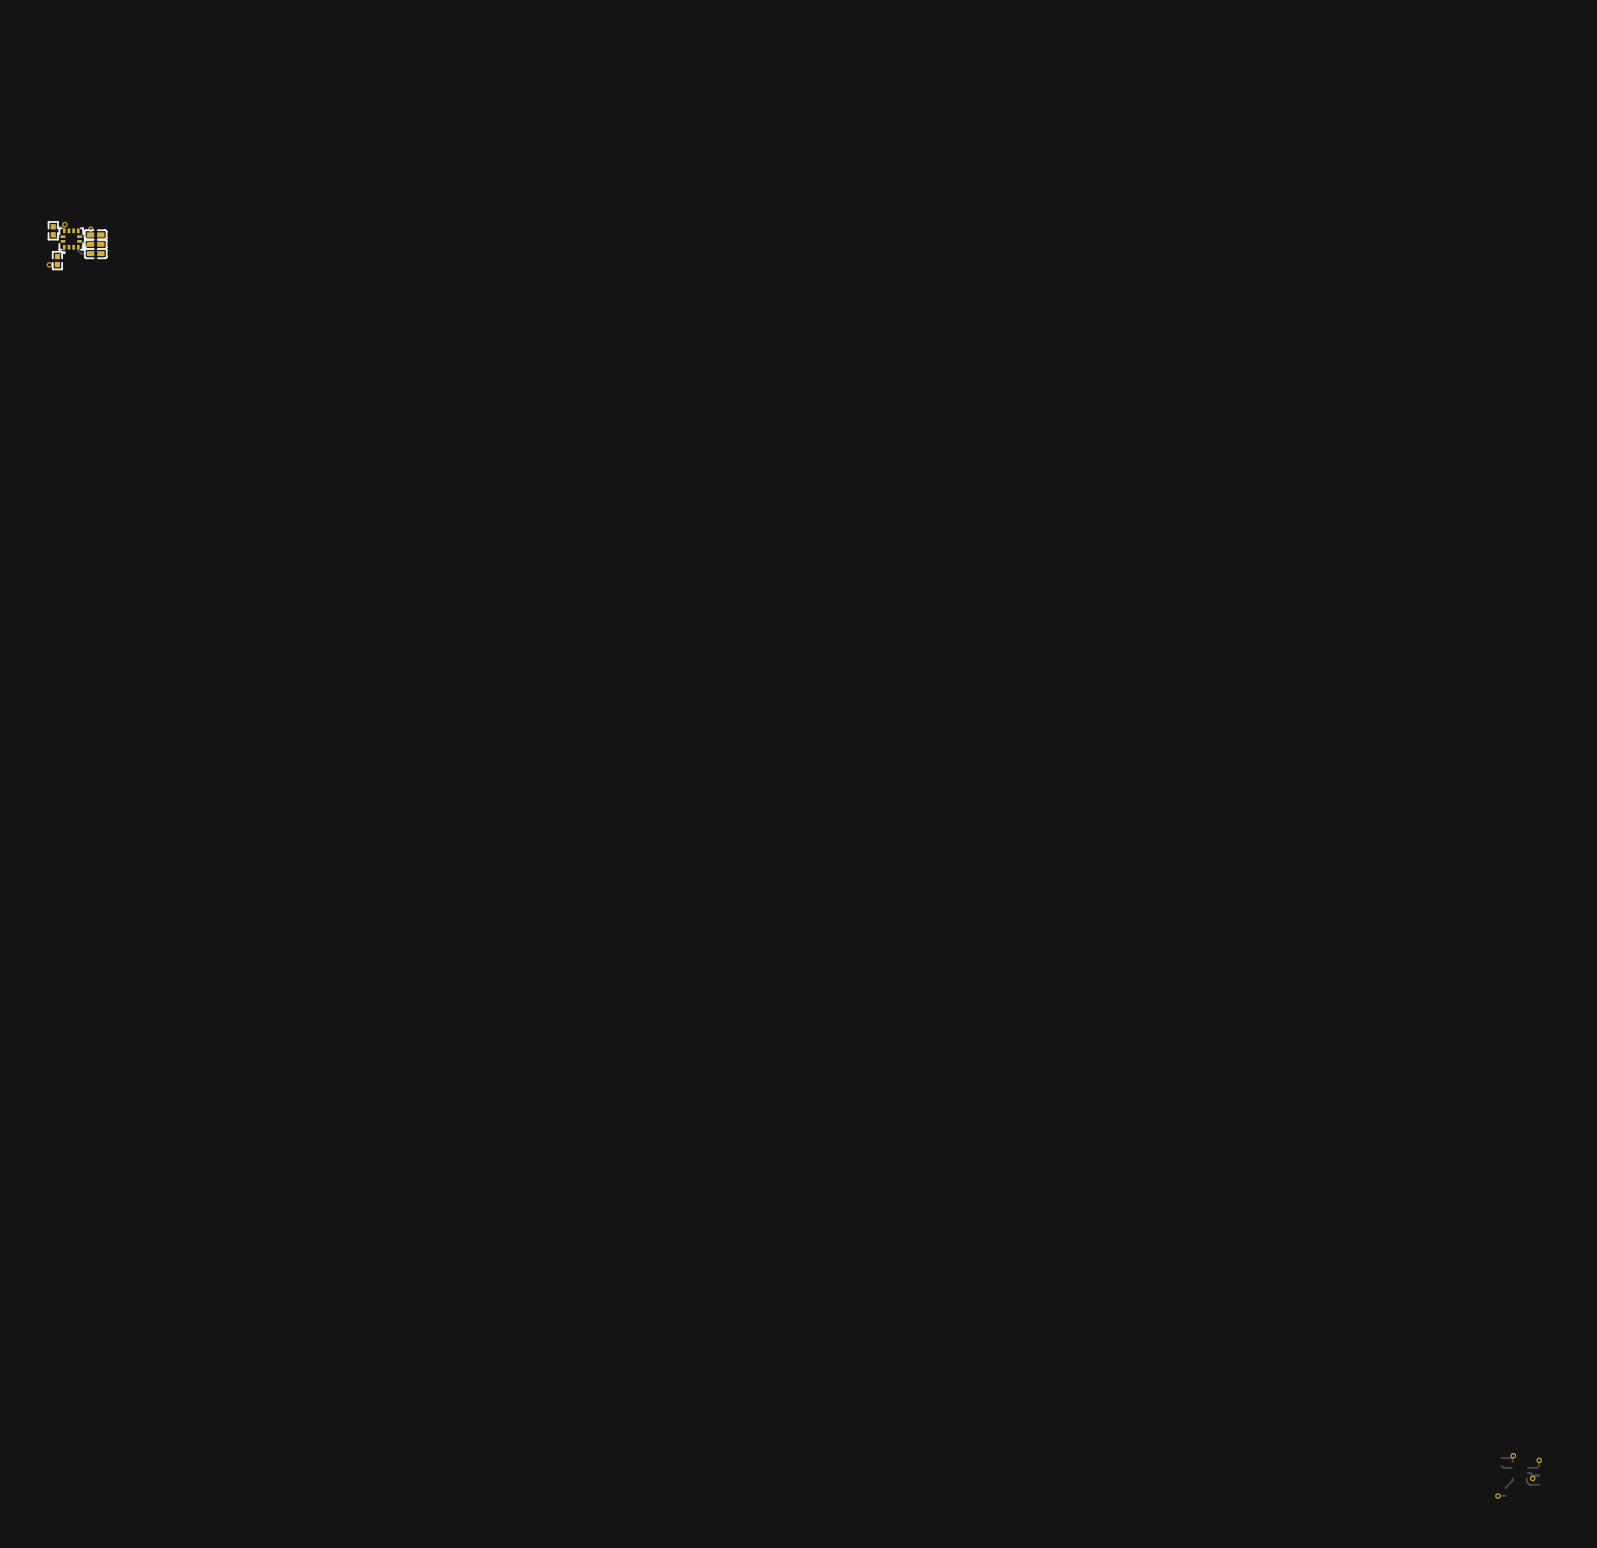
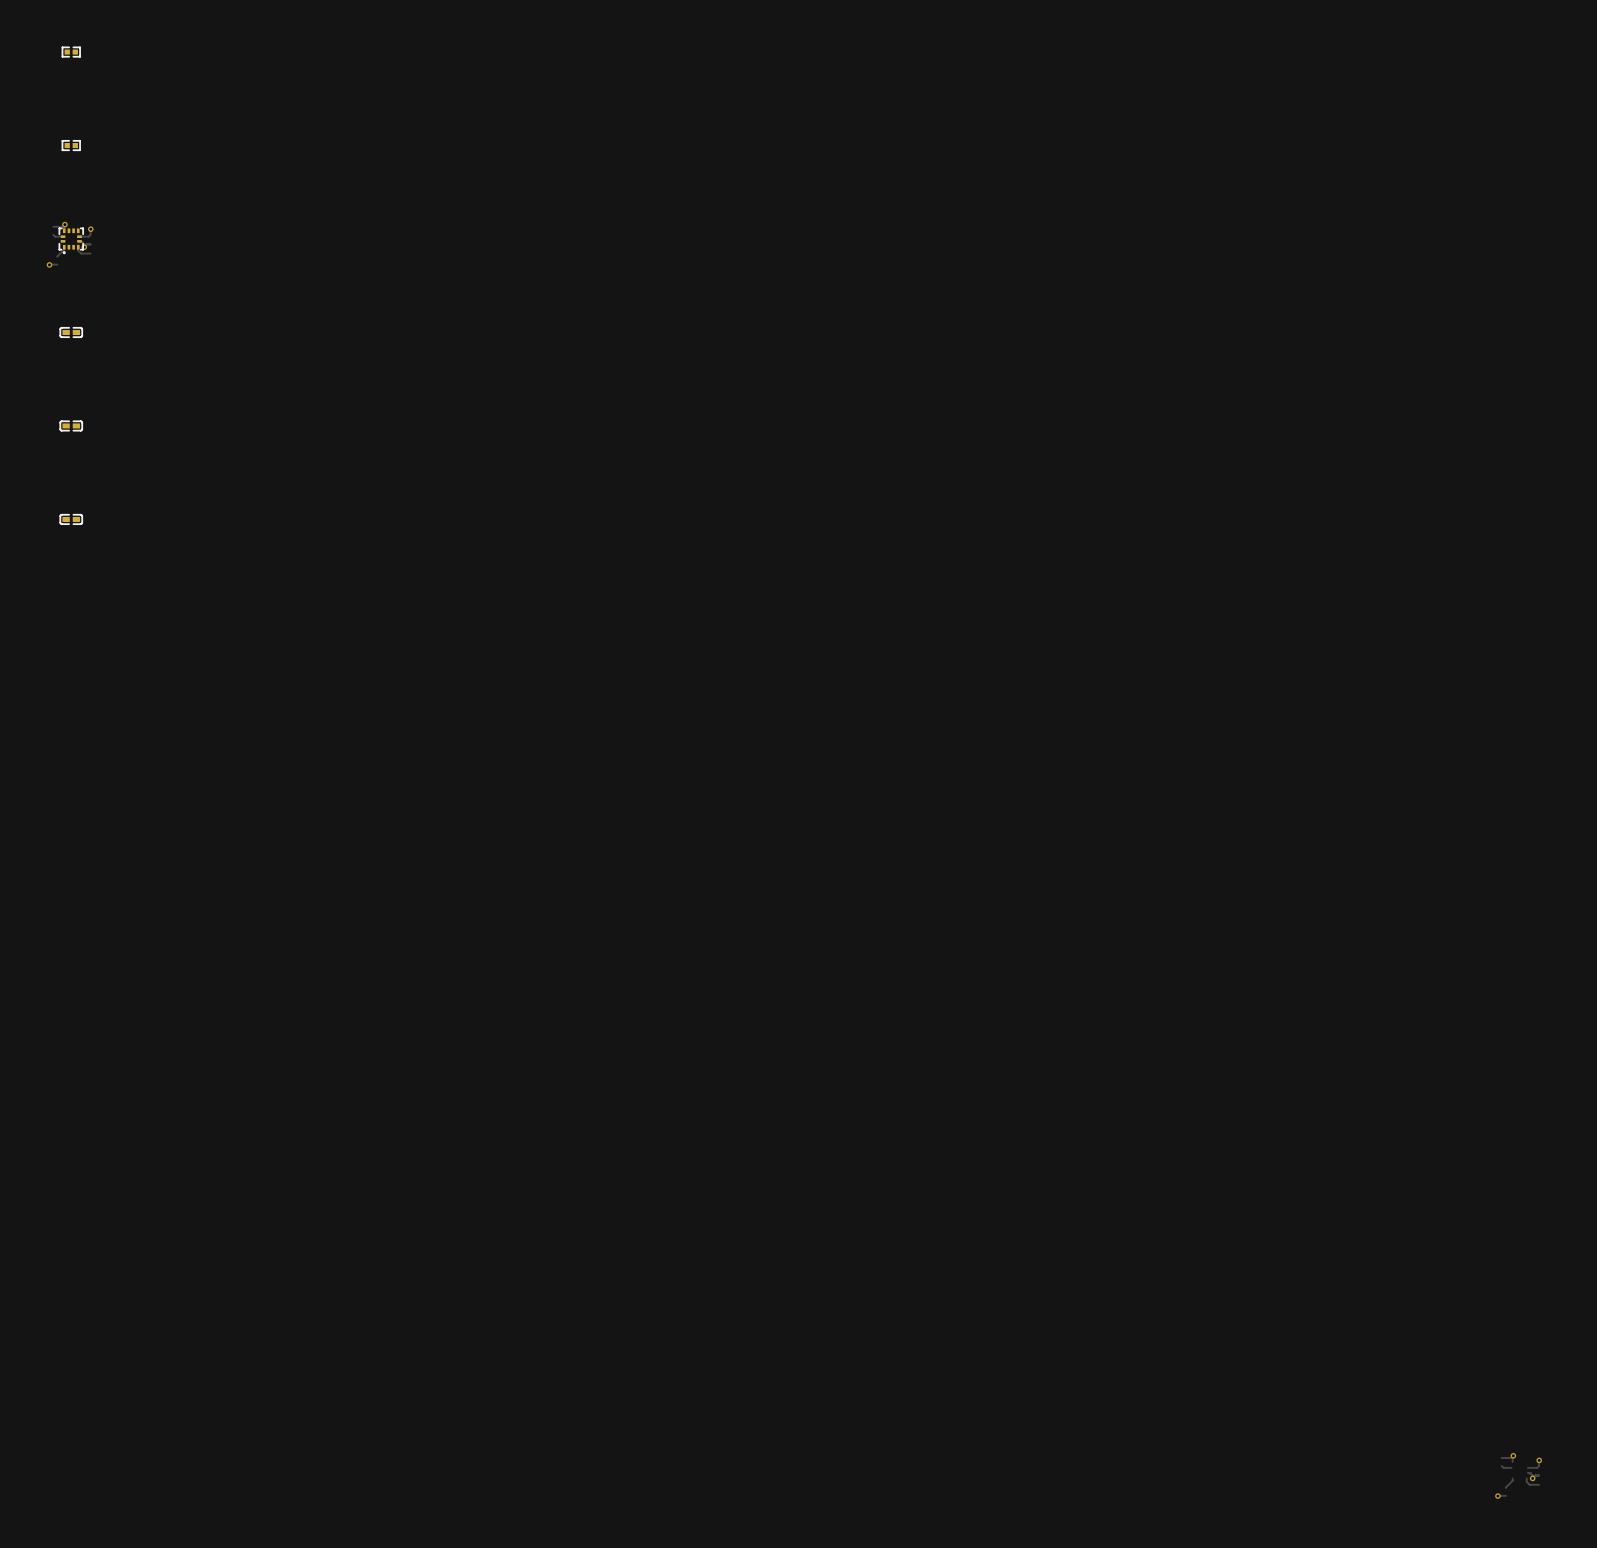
part: none -> (71, 52)
part: none -> (71, 145)
part: (53, 230) -> none
part: (95, 234) -> none
part: (95, 244) -> none
part: (95, 253) -> none
part: (57, 260) -> none
part: none -> (71, 332)
part: none -> (71, 425)
part: none -> (71, 519)

